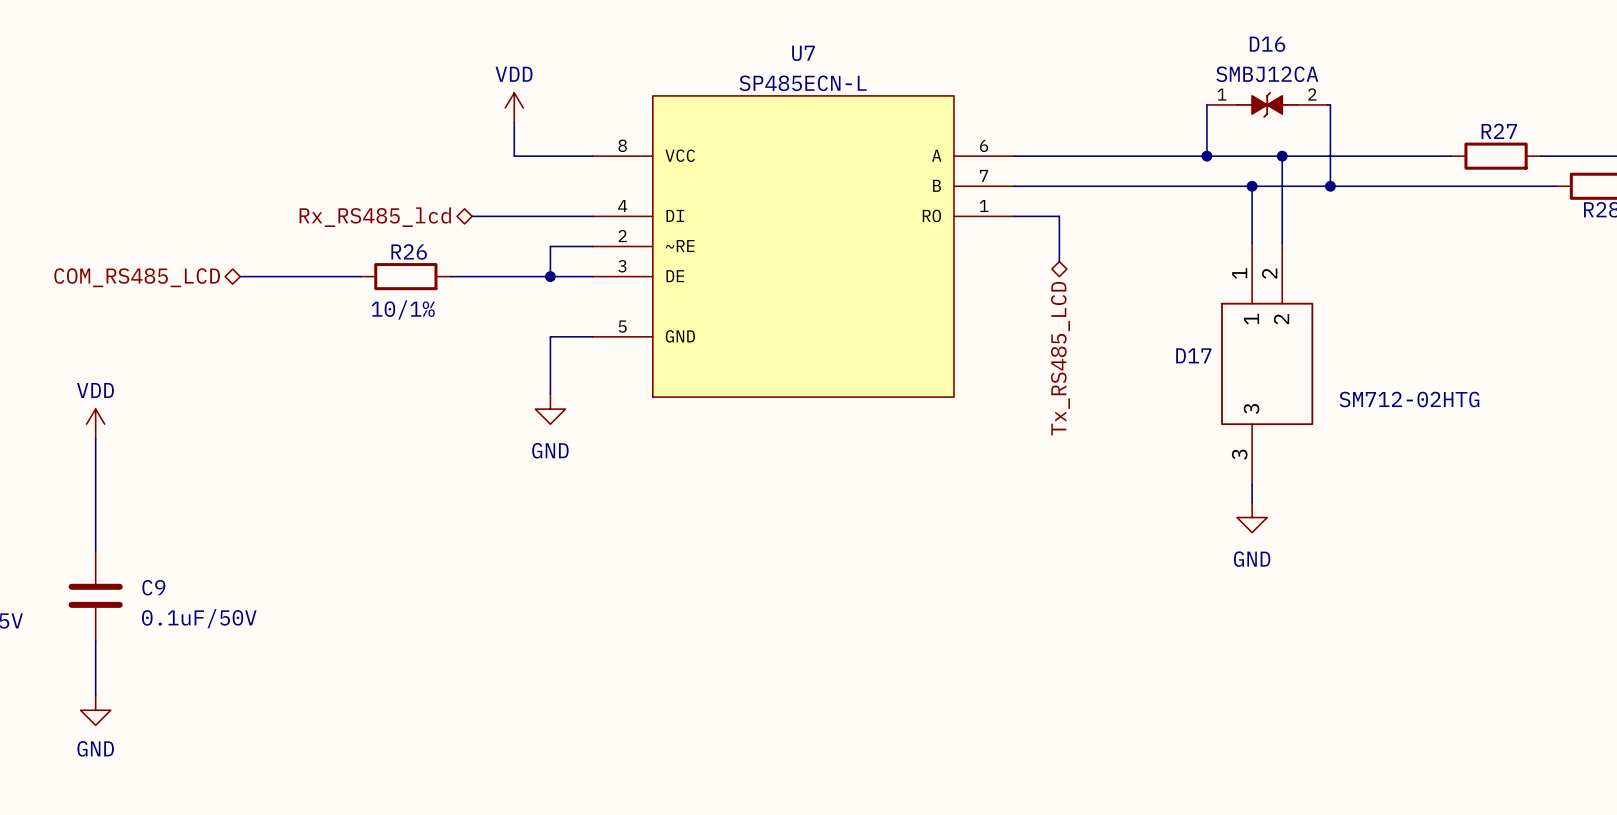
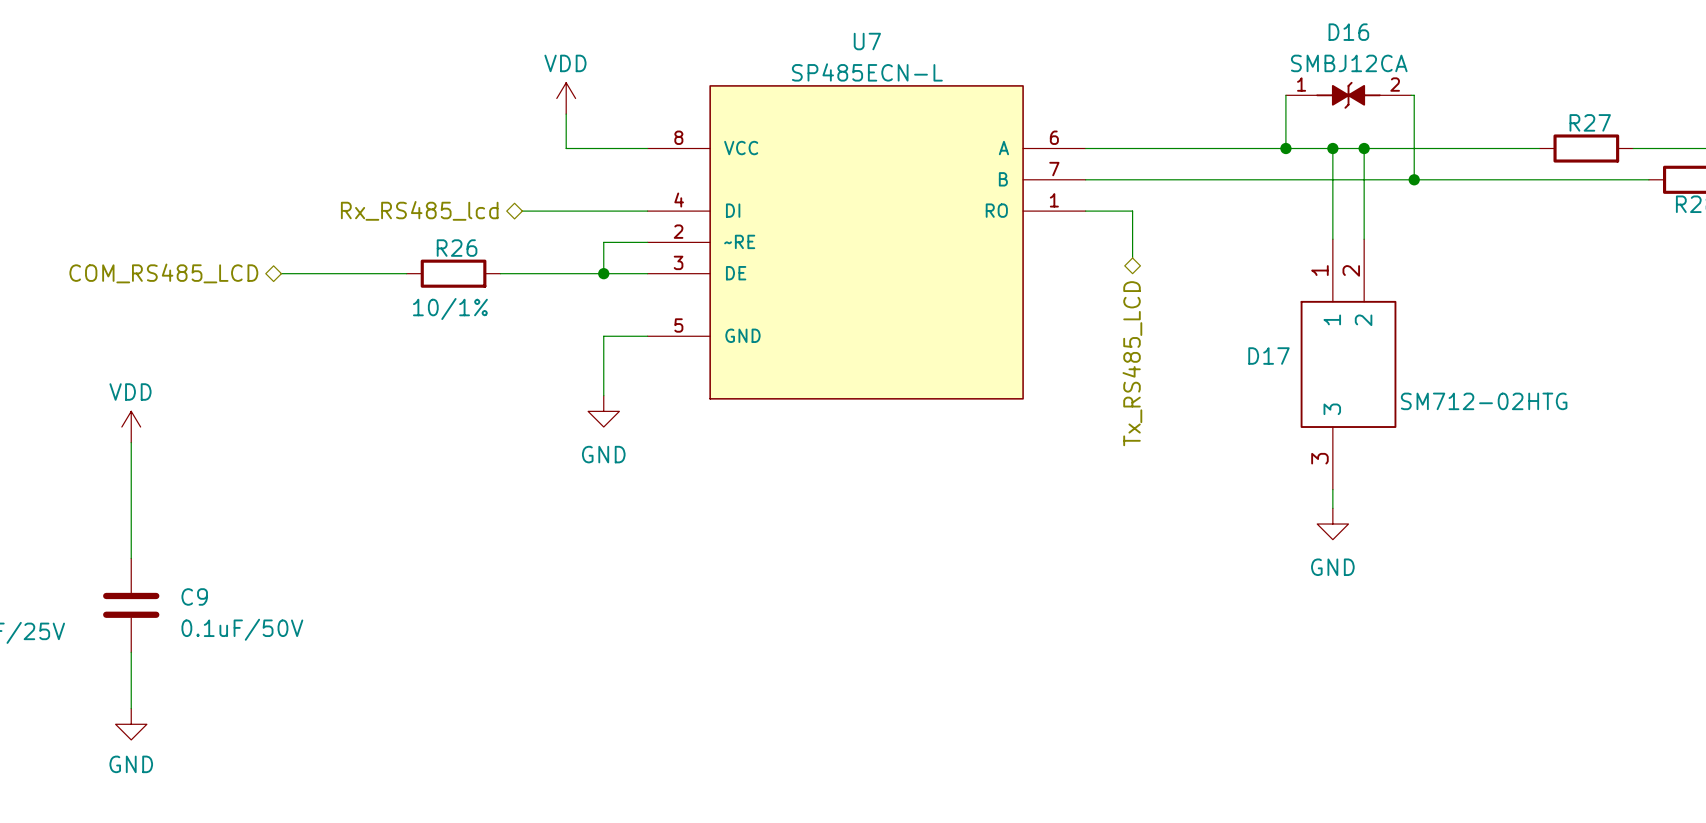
wire: none -> (1332, 148) (1332, 179)
junction position: (1252, 186) -> (1332, 148)

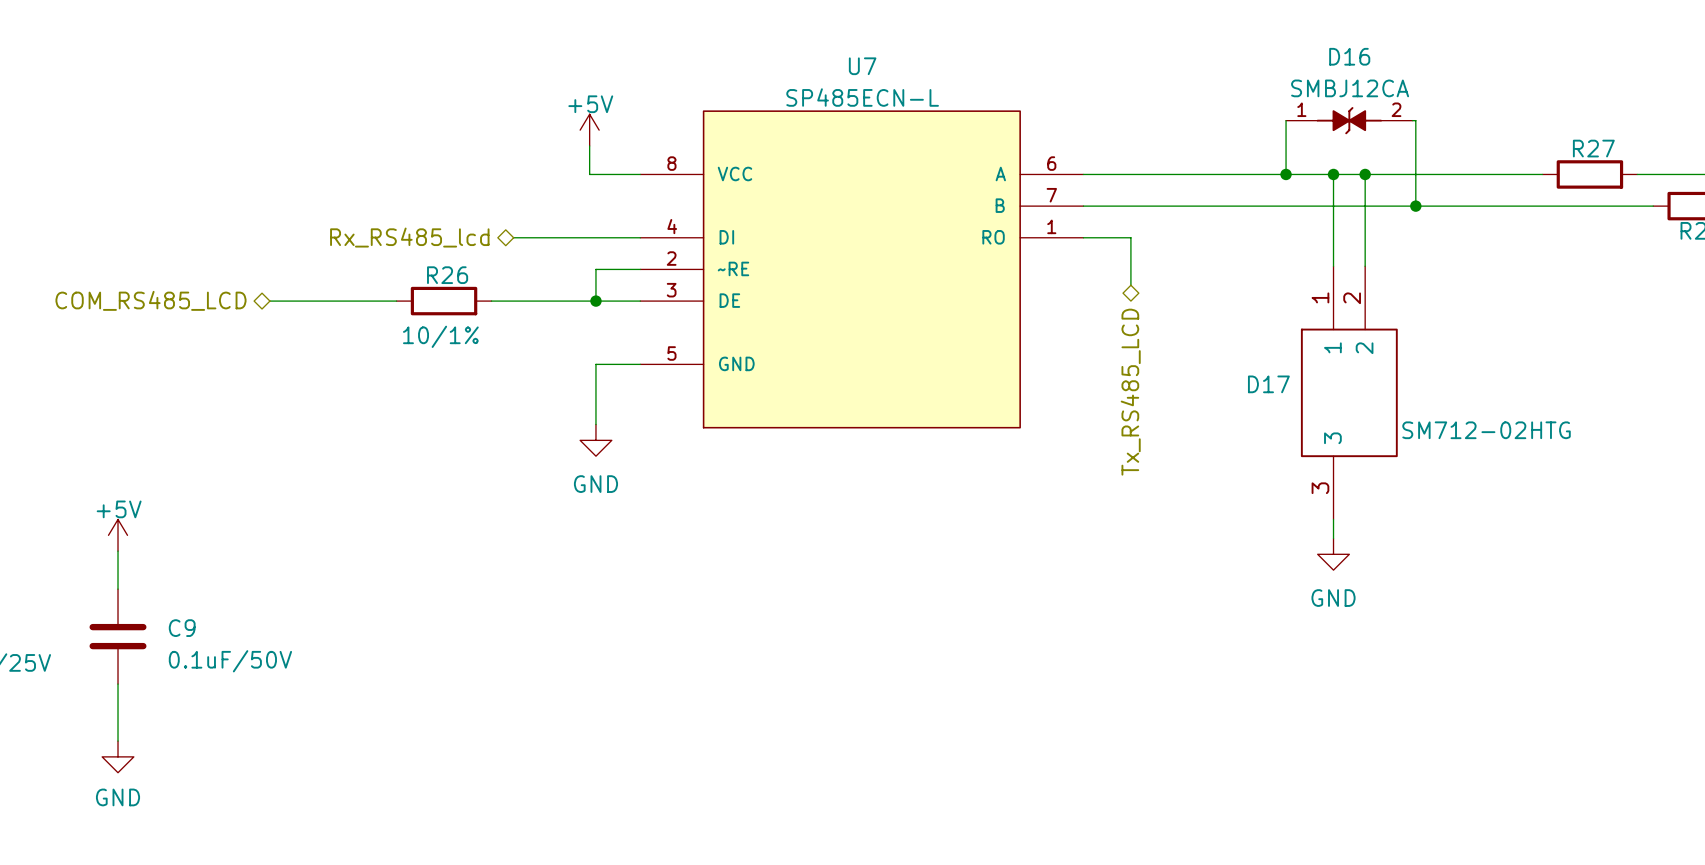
power symbol: VDD (566, 98) -> none
power symbol: none -> +5V (589, 130)
wire: (566, 114) (566, 148) (597, 148) -> (589, 145) (589, 174)
power symbol: VDD (131, 427) -> none
wire: (131, 442) (131, 520) -> none
power symbol: none -> +5V (118, 535)

